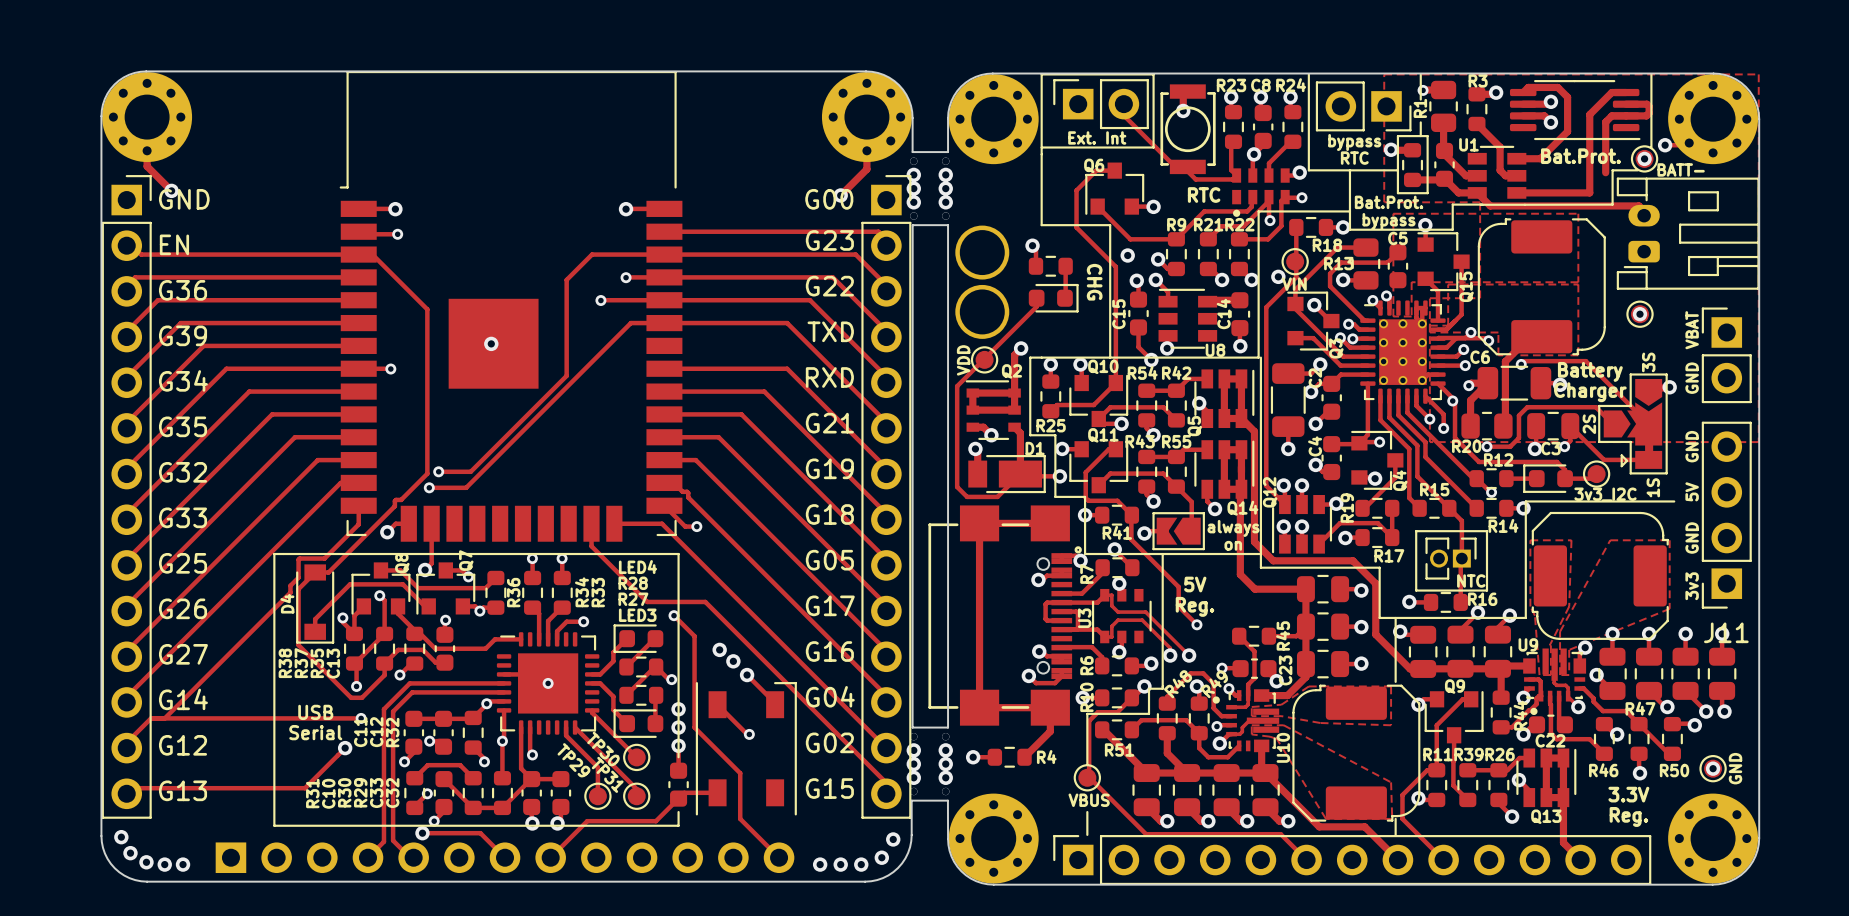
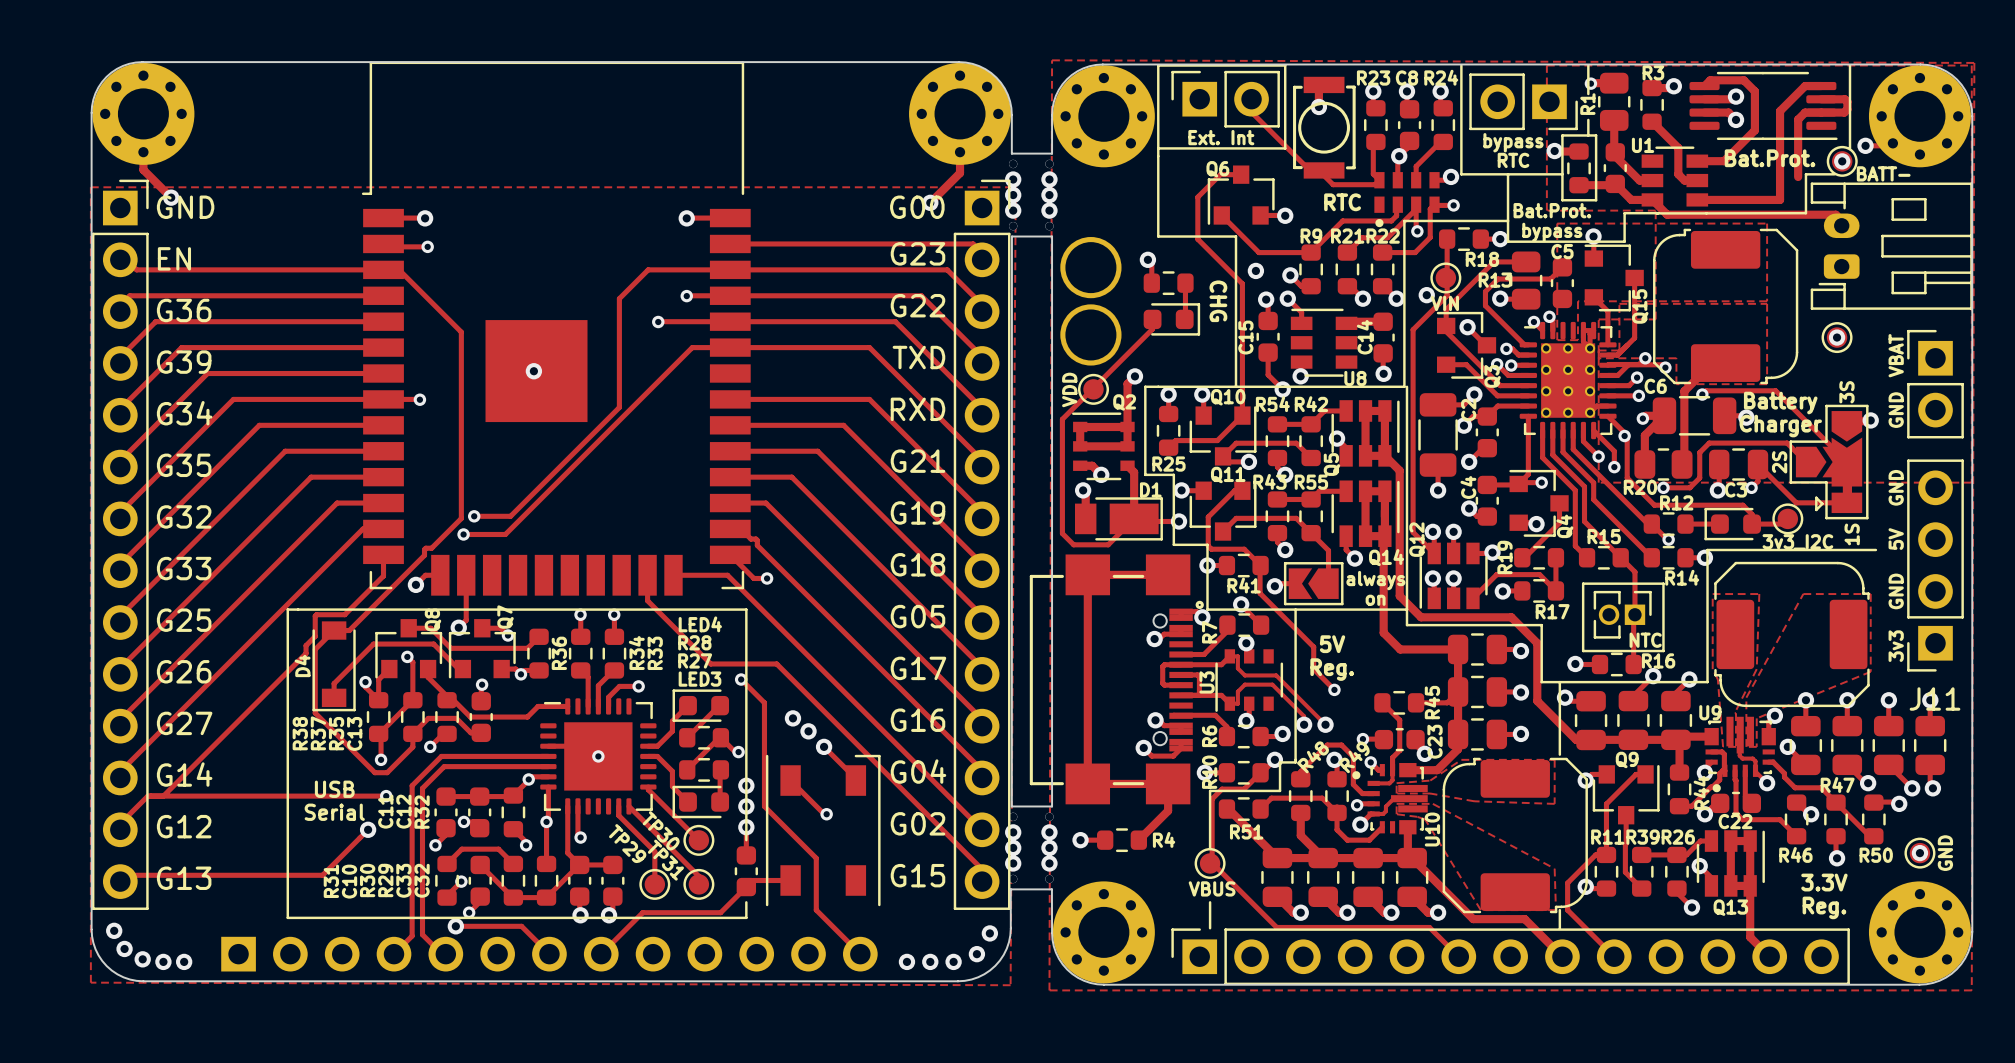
zone outline: none -> (1052, 60) (1049, 990) (1971, 990) (1974, 62) (1052, 60)
zone outline: none -> (90, 187) (90, 982) (1010, 985) (1015, 187) (90, 187)

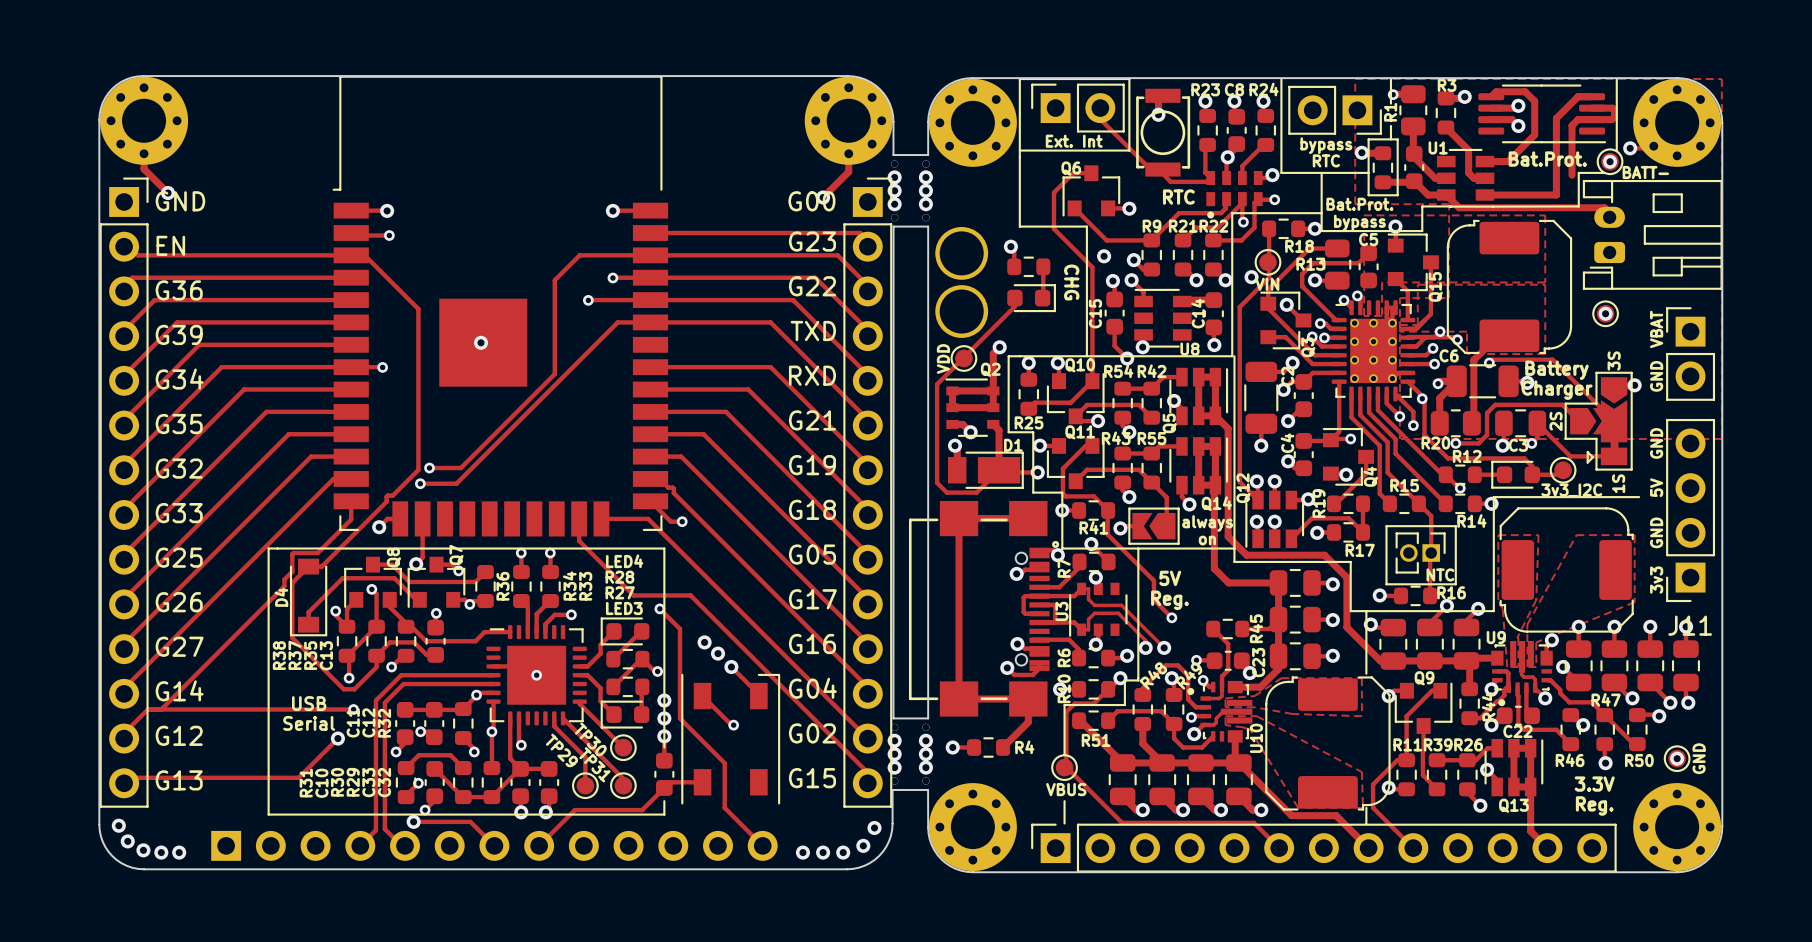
zone outline: (1052, 60) (1049, 990) (1971, 990) (1974, 62) (1052, 60) -> none
zone outline: (90, 187) (90, 982) (1010, 985) (1015, 187) (90, 187) -> none

